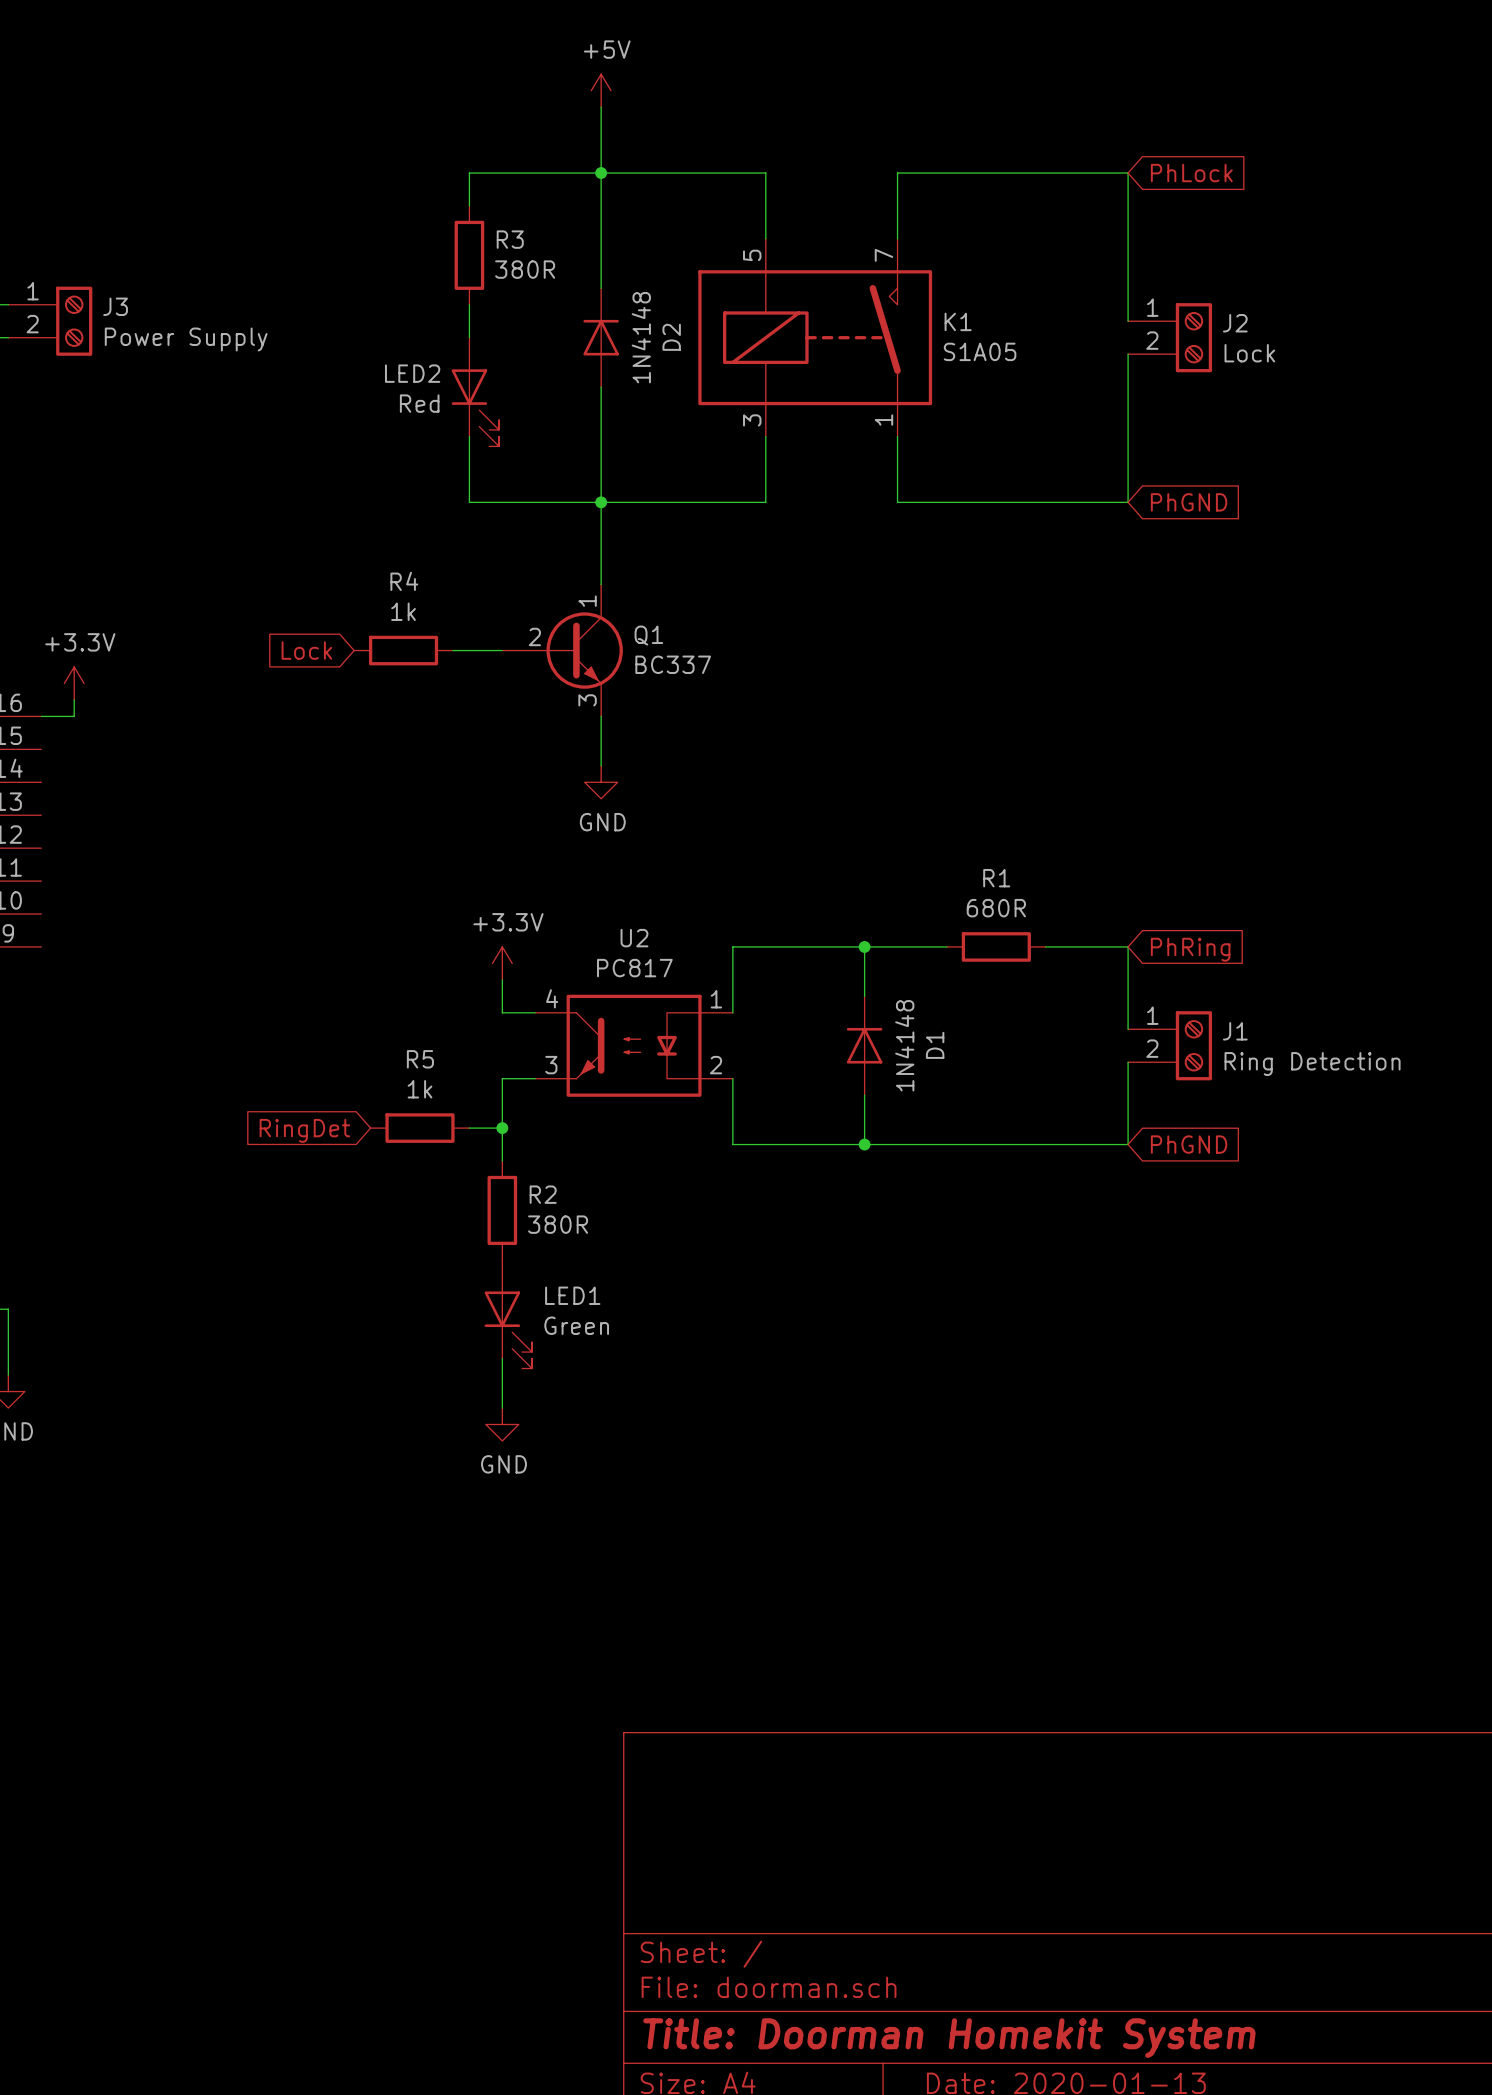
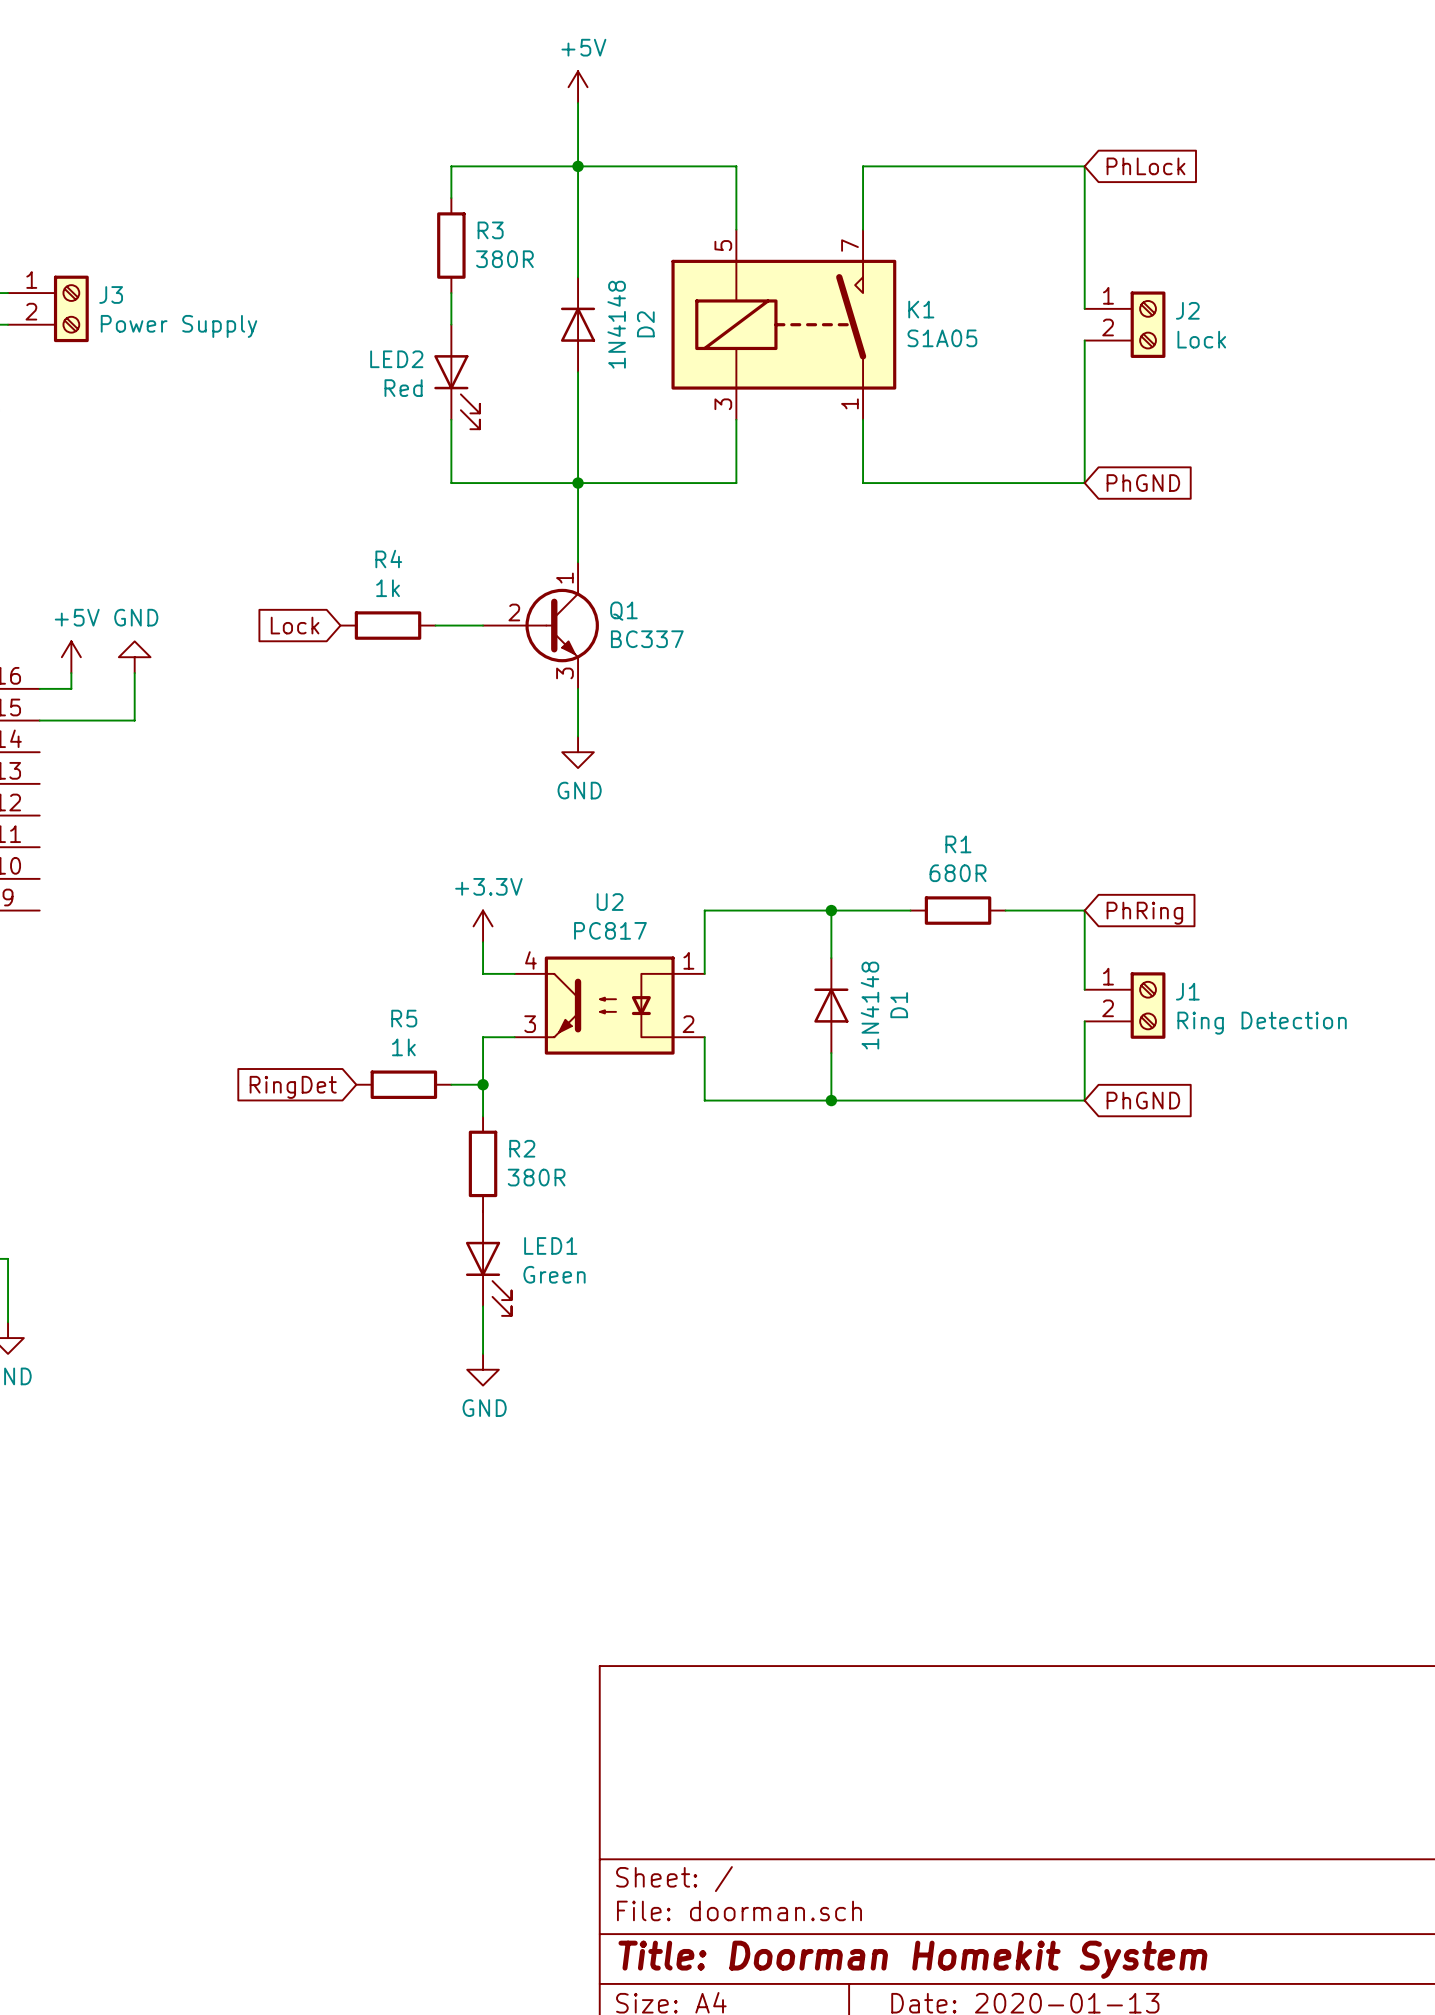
power symbol: +3.3V (74, 683) -> +5V (71, 657)
power symbol: none -> GND (134, 657)
wire: none -> (134, 673) (134, 720) (39, 720)

